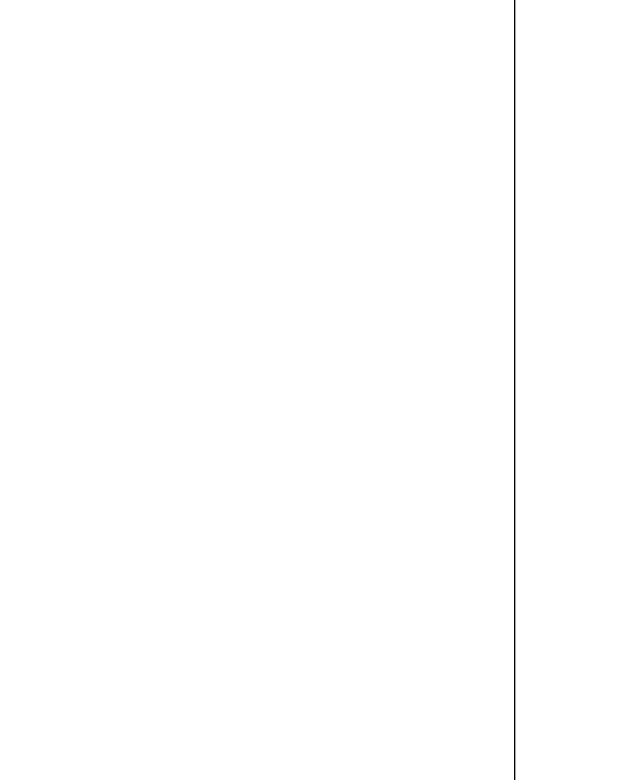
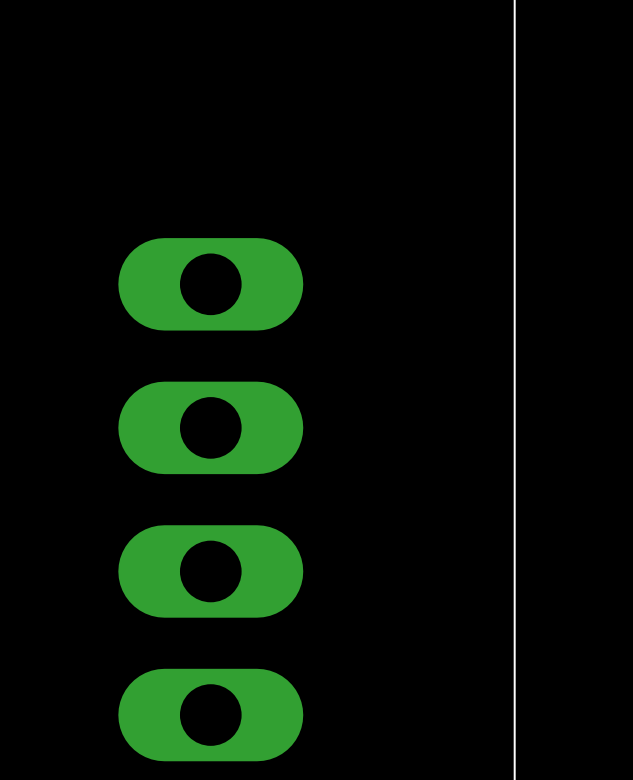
part: none -> (210, 499)

